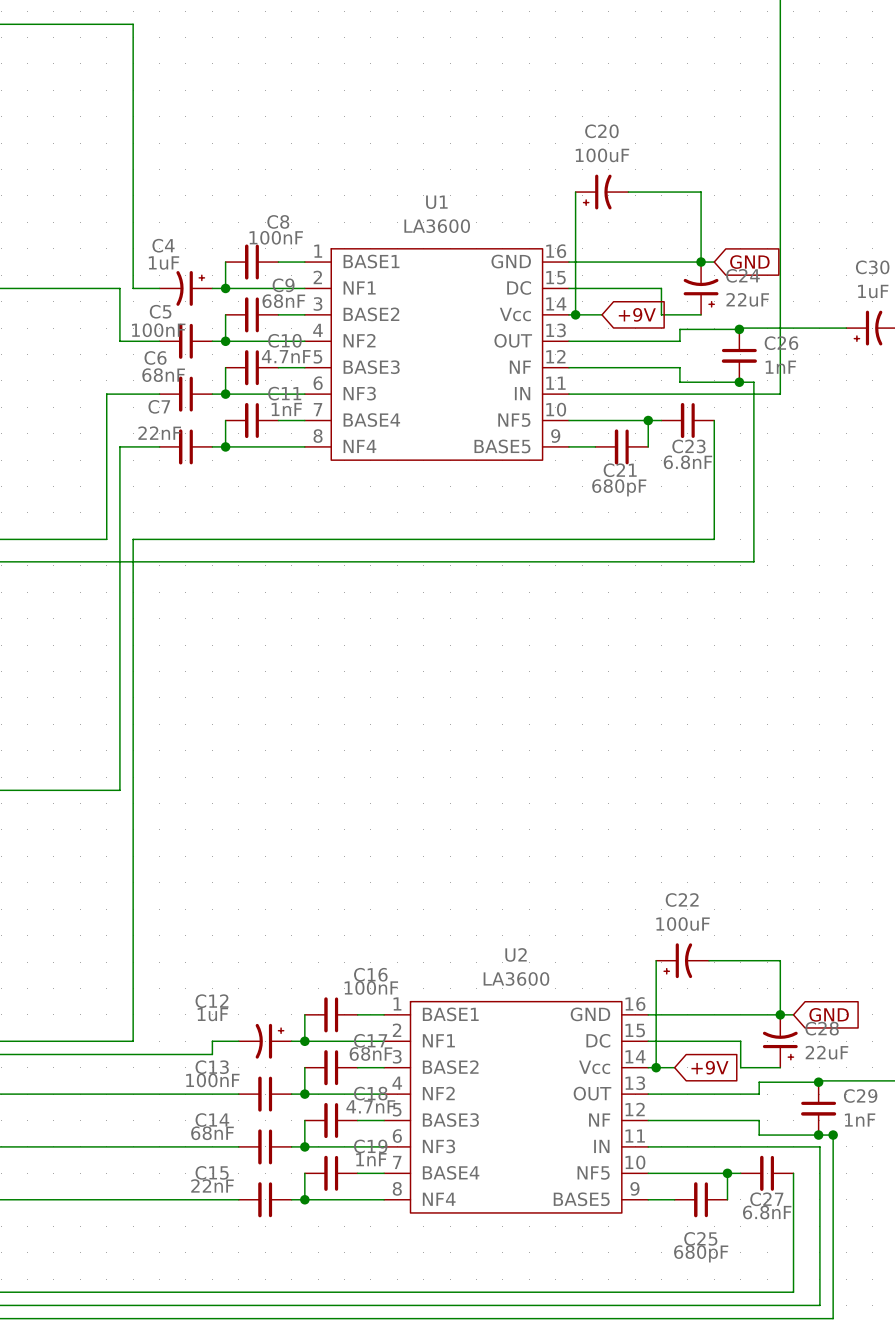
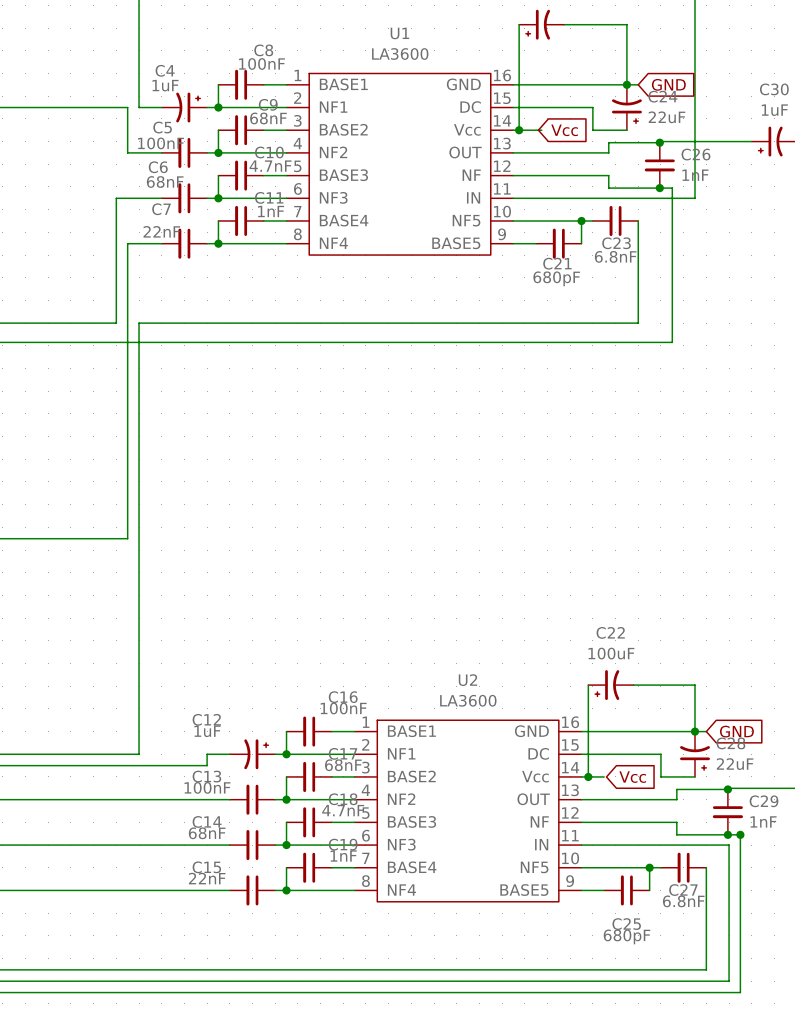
global label: +9V (637, 314) -> Vcc (564, 130)
global label: +9V (709, 1067) -> Vcc (632, 777)

